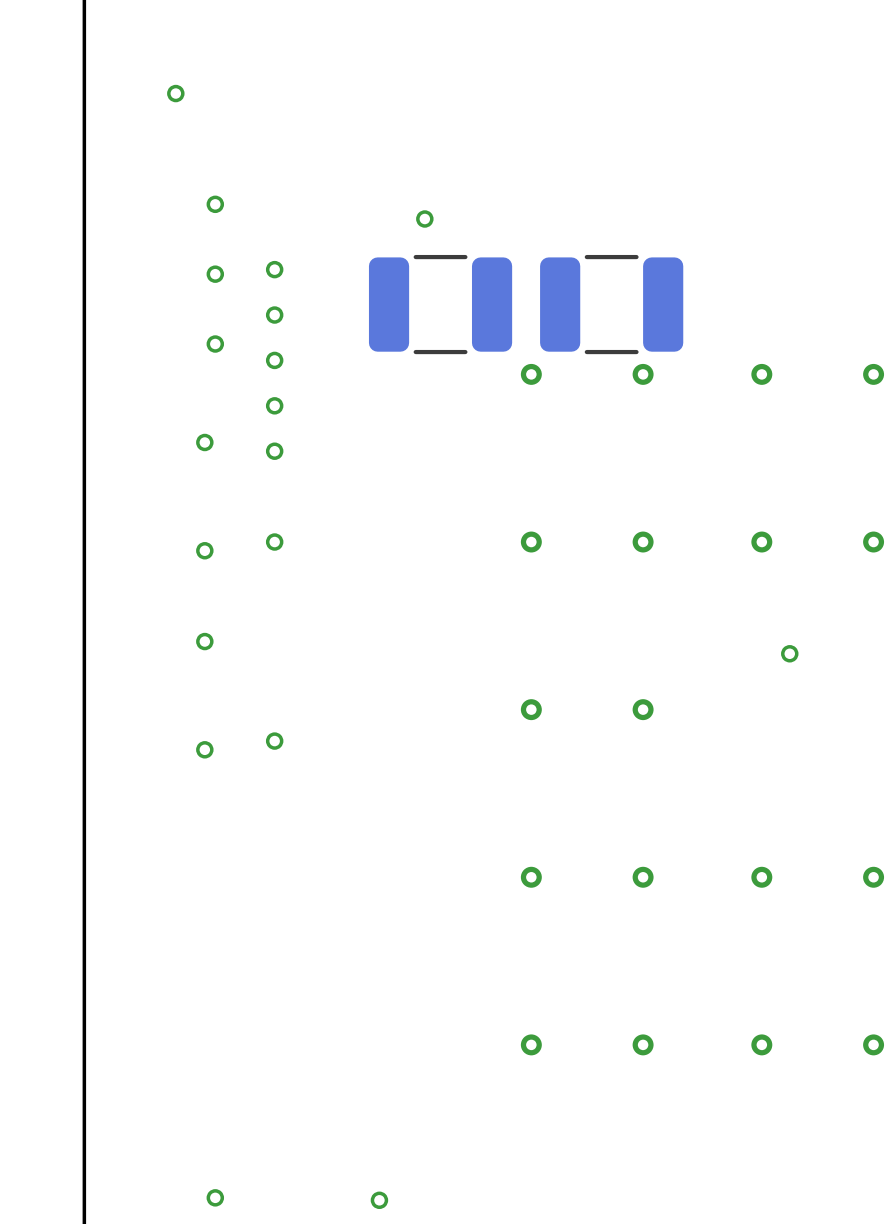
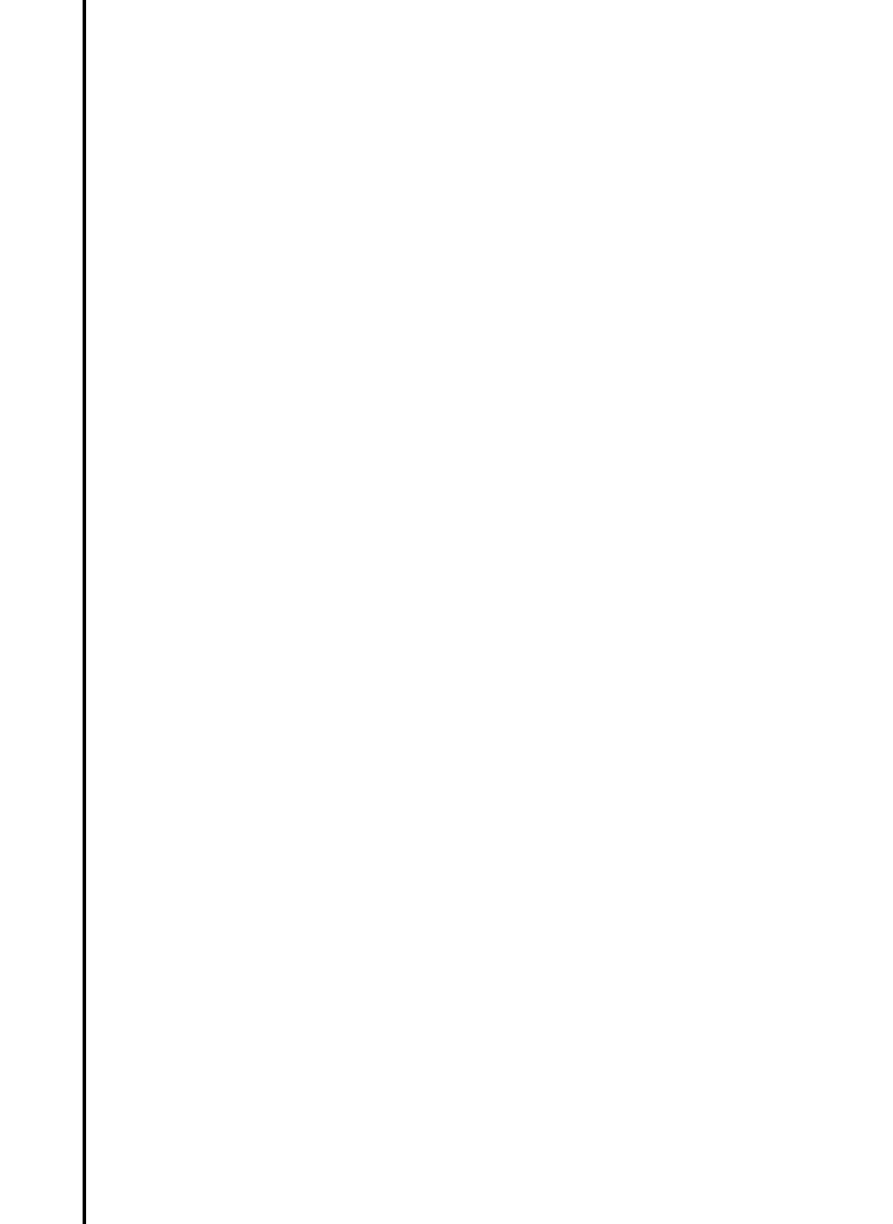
via: (175, 93) -> none
via: (215, 204) -> none
via: (424, 218) -> none
via: (274, 269) -> none
via: (215, 274) -> none
part: (440, 304) -> none
part: (611, 304) -> none
via: (274, 315) -> none
via: (215, 344) -> none
via: (274, 360) -> none
via: (531, 374) -> none
via: (643, 374) -> none
via: (761, 374) -> none
via: (873, 374) -> none
via: (274, 405) -> none
via: (204, 442) -> none
via: (274, 451) -> none
via: (274, 542) -> none
via: (531, 542) -> none
via: (643, 542) -> none
via: (761, 542) -> none
via: (873, 542) -> none
via: (204, 550) -> none
via: (204, 641) -> none
via: (789, 653) -> none
via: (531, 709) -> none
via: (643, 709) -> none
via: (274, 741) -> none
via: (204, 749) -> none
via: (531, 877) -> none
via: (643, 877) -> none
via: (761, 877) -> none
via: (873, 877) -> none
via: (531, 1044) -> none
via: (643, 1044) -> none
via: (761, 1044) -> none
via: (873, 1044) -> none
via: (215, 1197) -> none
via: (379, 1200) -> none

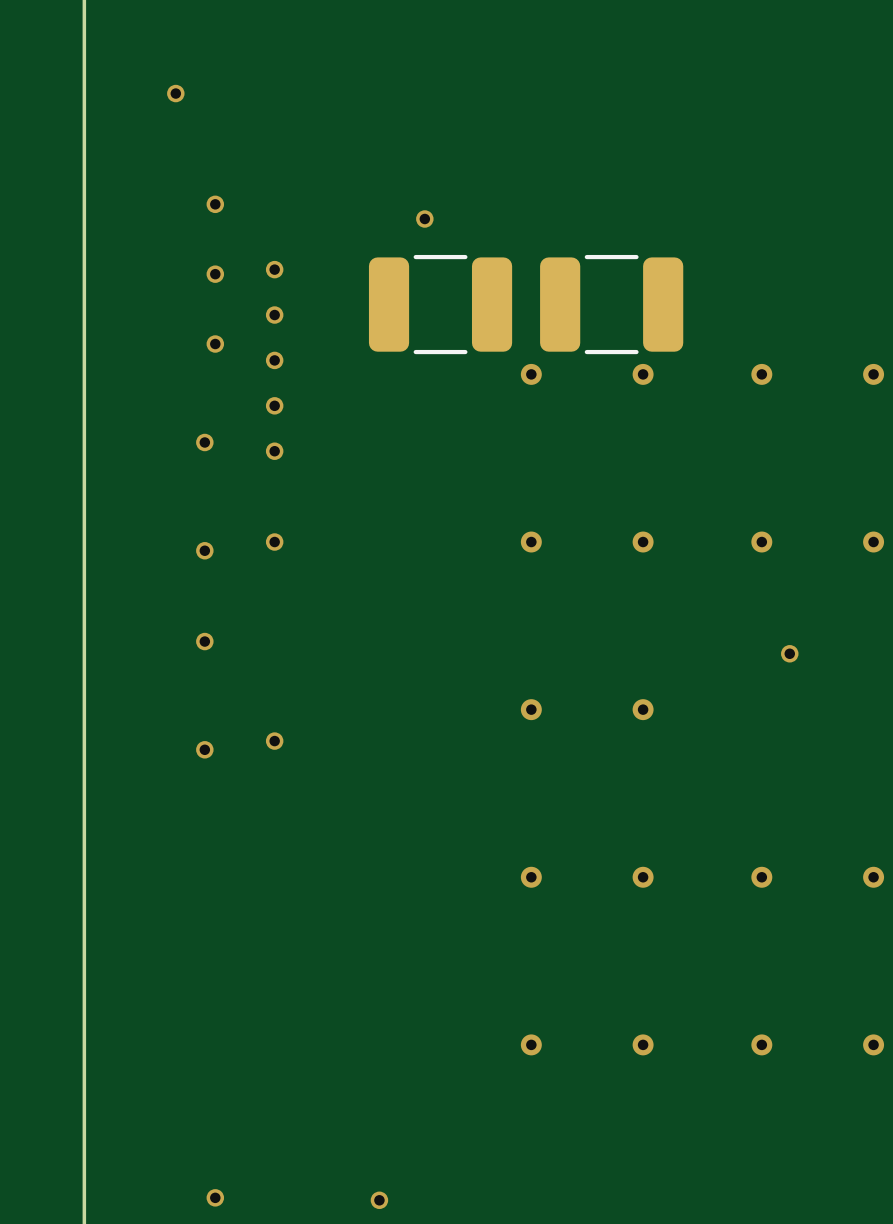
via: none -> (175, 93)
via: none -> (215, 204)
via: none -> (424, 218)
via: none -> (274, 269)
via: none -> (215, 274)
part: none -> (440, 304)
part: none -> (611, 304)
via: none -> (274, 315)
via: none -> (215, 344)
via: none -> (274, 360)
via: none -> (531, 374)
via: none -> (643, 374)
via: none -> (761, 374)
via: none -> (873, 374)
via: none -> (274, 405)
via: none -> (204, 442)
via: none -> (274, 451)
via: none -> (274, 542)
via: none -> (531, 542)
via: none -> (643, 542)
via: none -> (761, 542)
via: none -> (873, 542)
via: none -> (204, 550)
via: none -> (204, 641)
via: none -> (789, 653)
via: none -> (531, 709)
via: none -> (643, 709)
via: none -> (274, 741)
via: none -> (204, 749)
via: none -> (531, 877)
via: none -> (643, 877)
via: none -> (761, 877)
via: none -> (873, 877)
via: none -> (531, 1044)
via: none -> (643, 1044)
via: none -> (761, 1044)
via: none -> (873, 1044)
via: none -> (215, 1197)
via: none -> (379, 1200)

